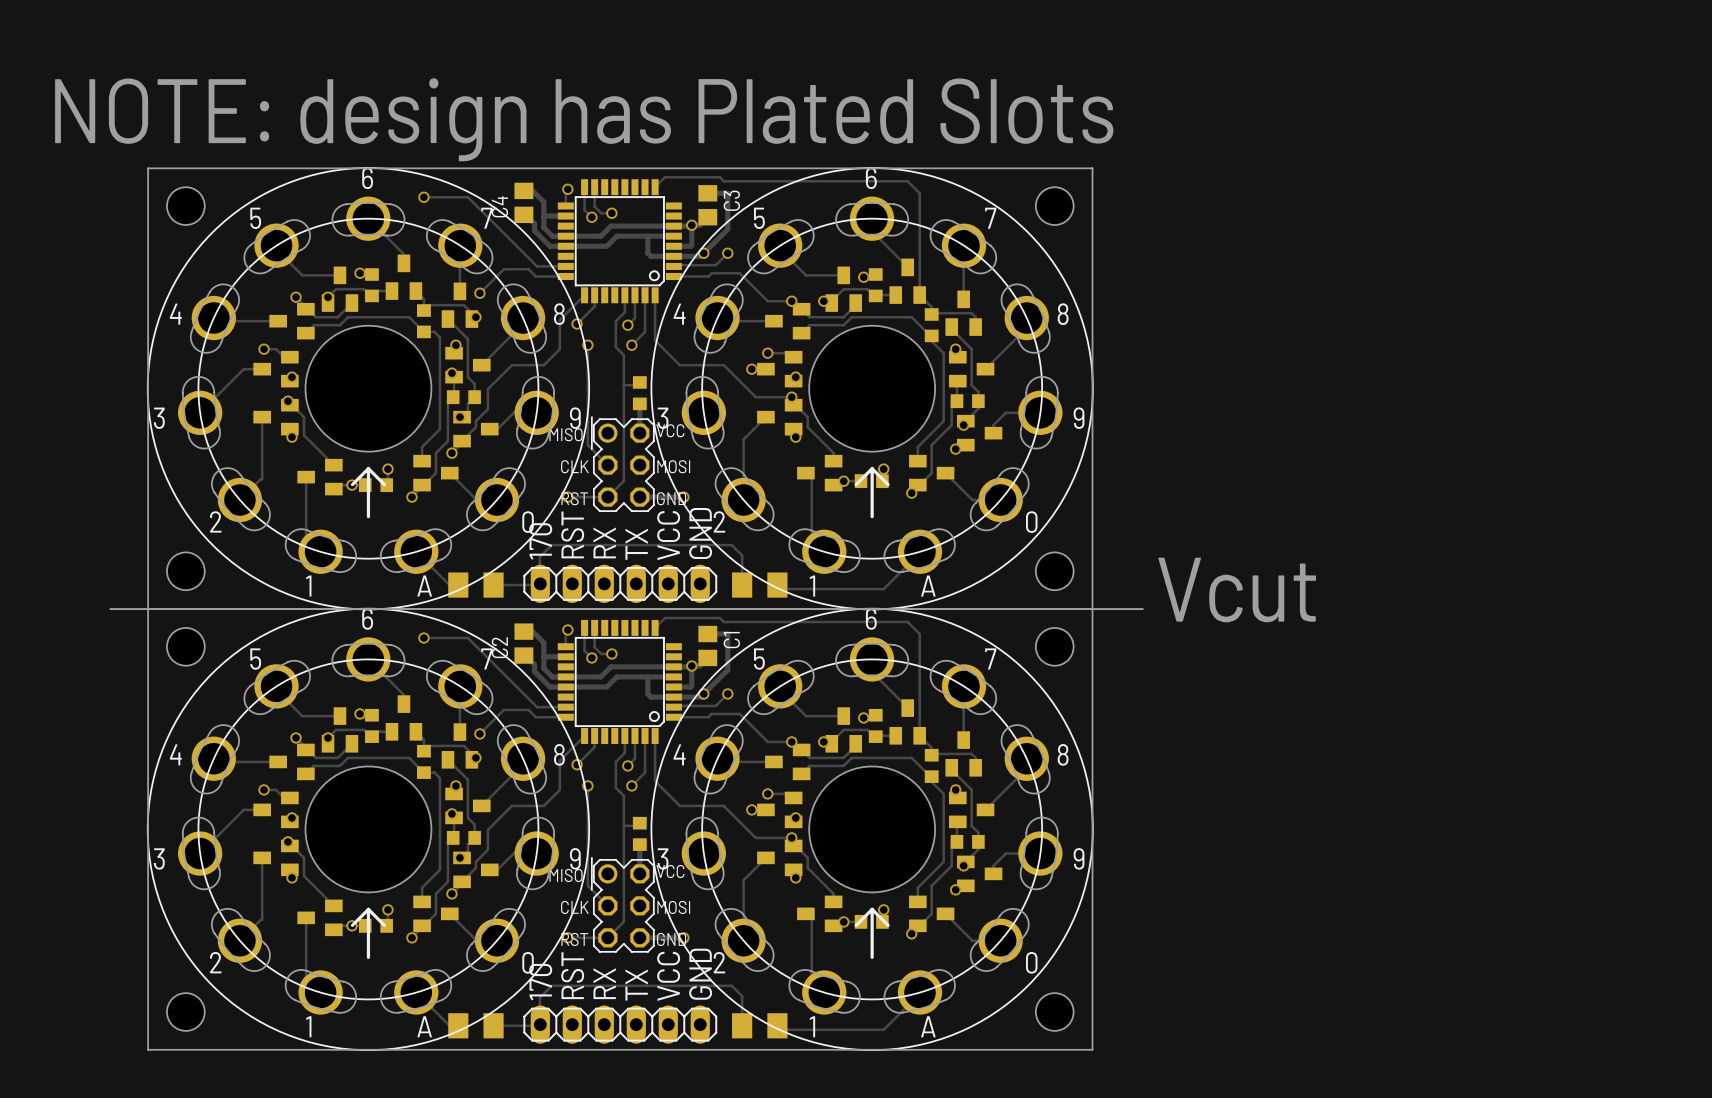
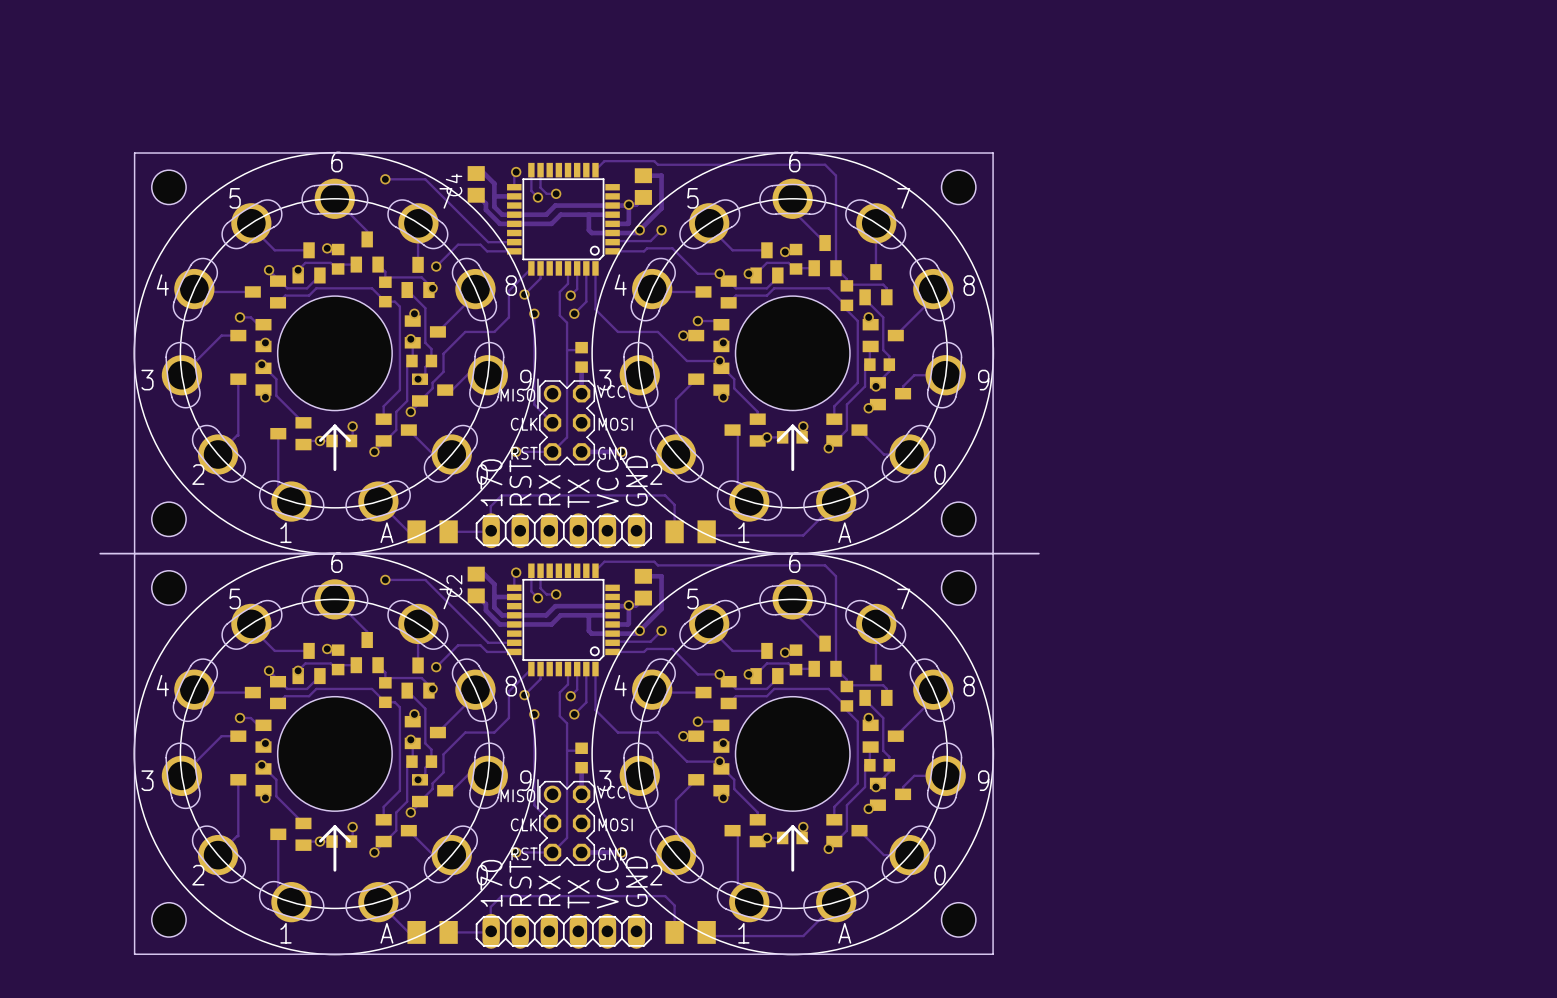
text: NOTE: design has Plated Slots (584, 119) -> none
C3 name: C3 (731, 200) -> none
text: Vcut (1237, 590) -> none
C1 name: C1 (731, 640) -> none

